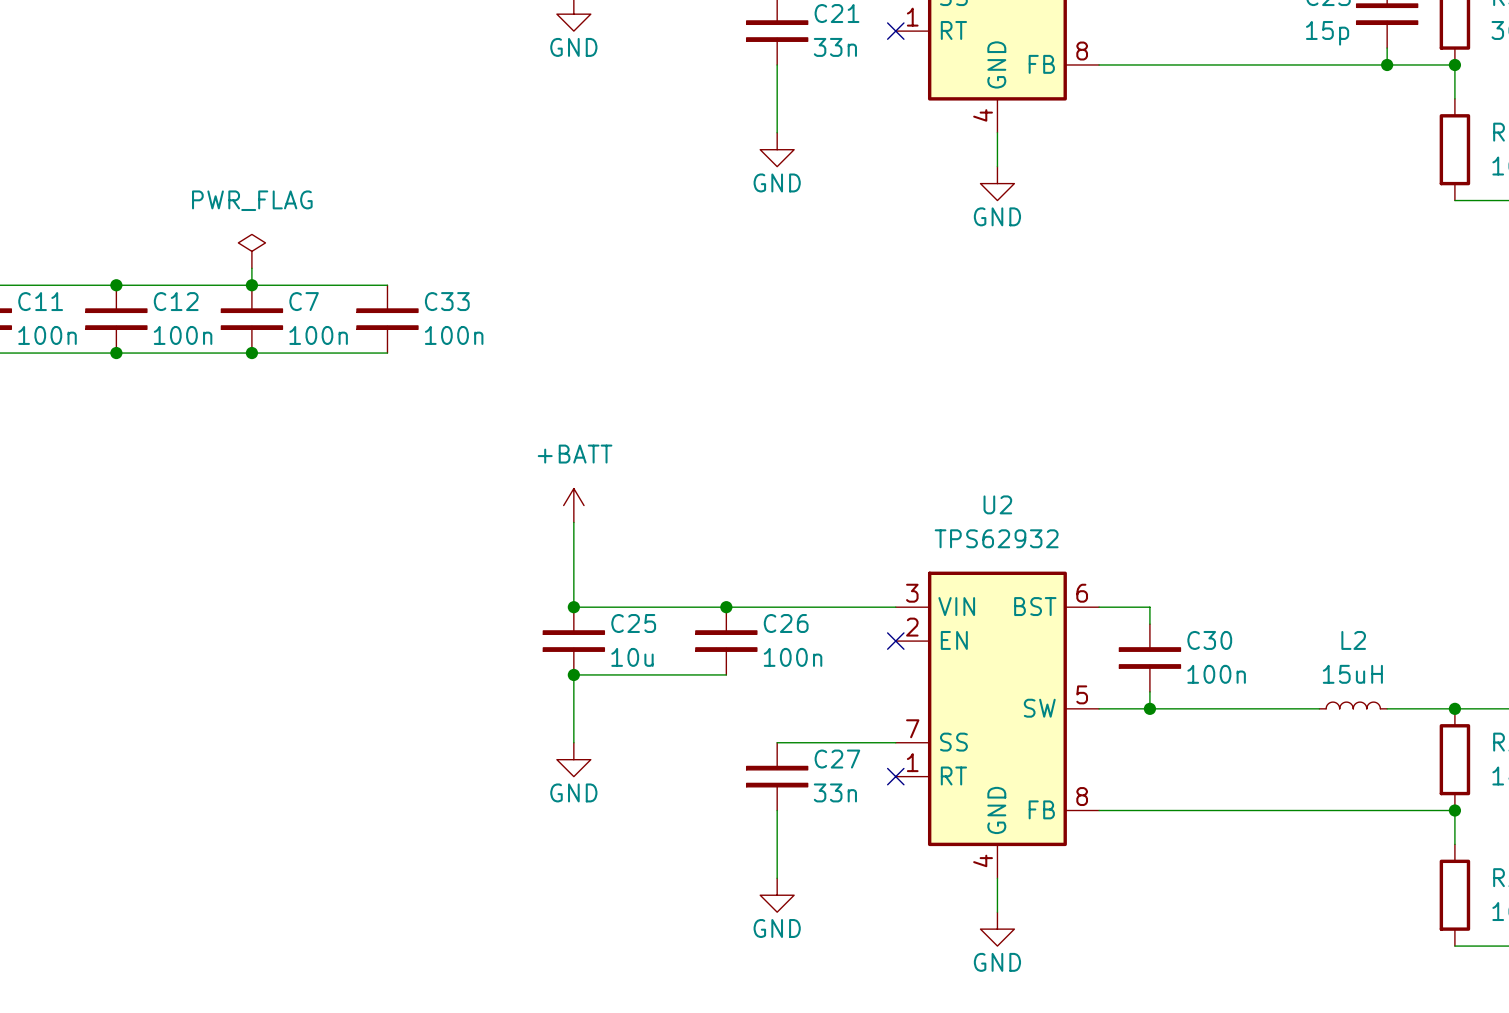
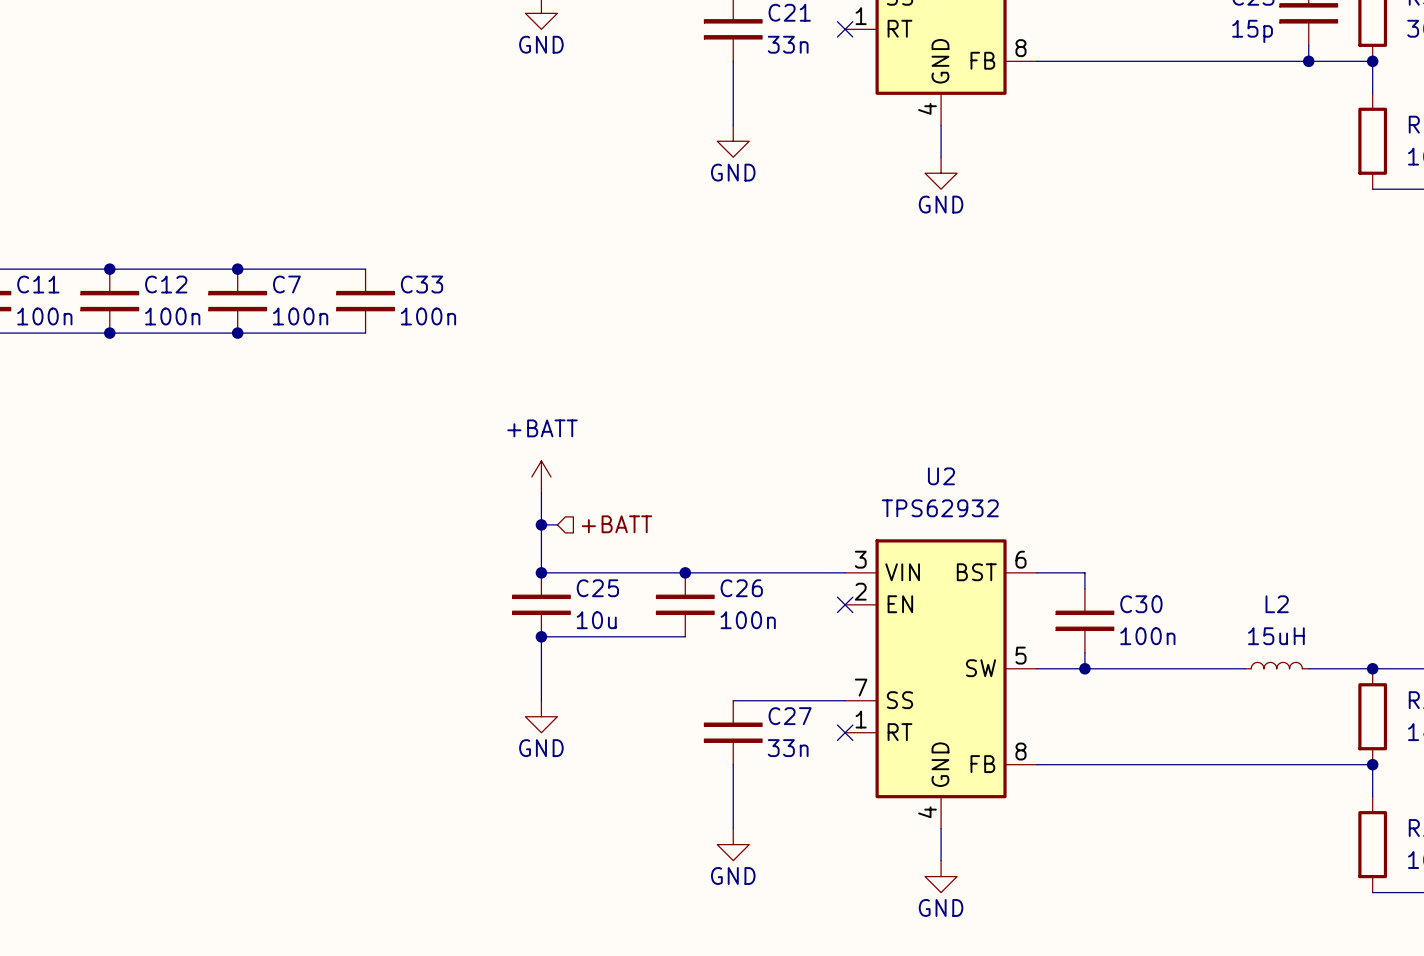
power symbol: PWR_FLAG (251, 251) -> none
wire: (251, 268) (251, 285) -> none
hierarchical label: none -> +BATT (617, 524)
wire: none -> (541, 524) (557, 524)
junction: none -> (541, 524)

